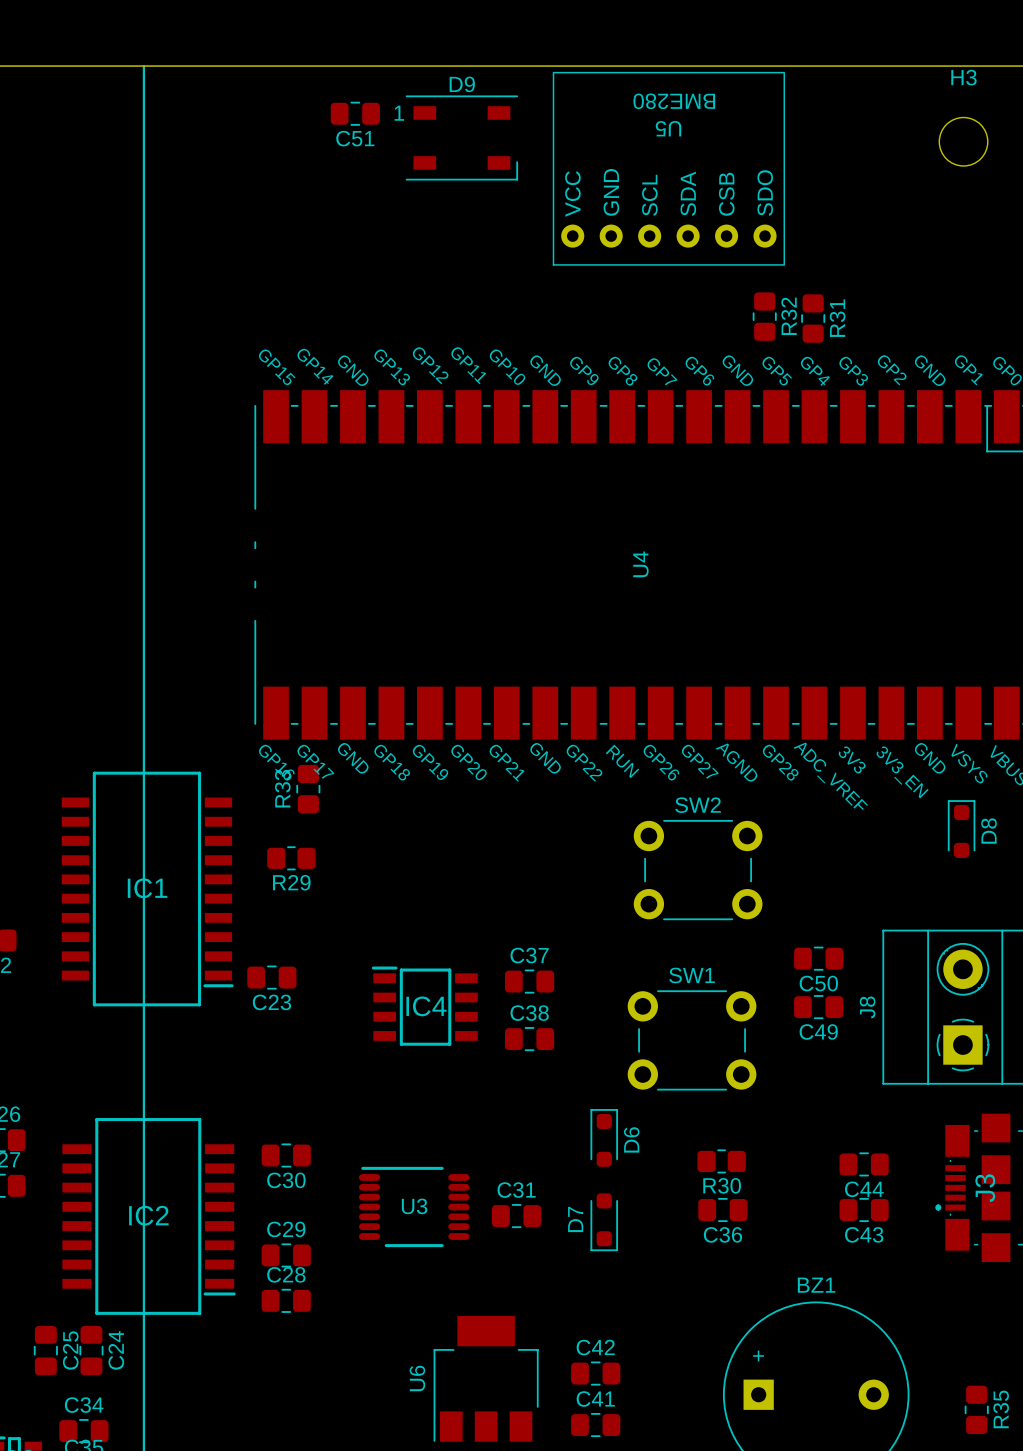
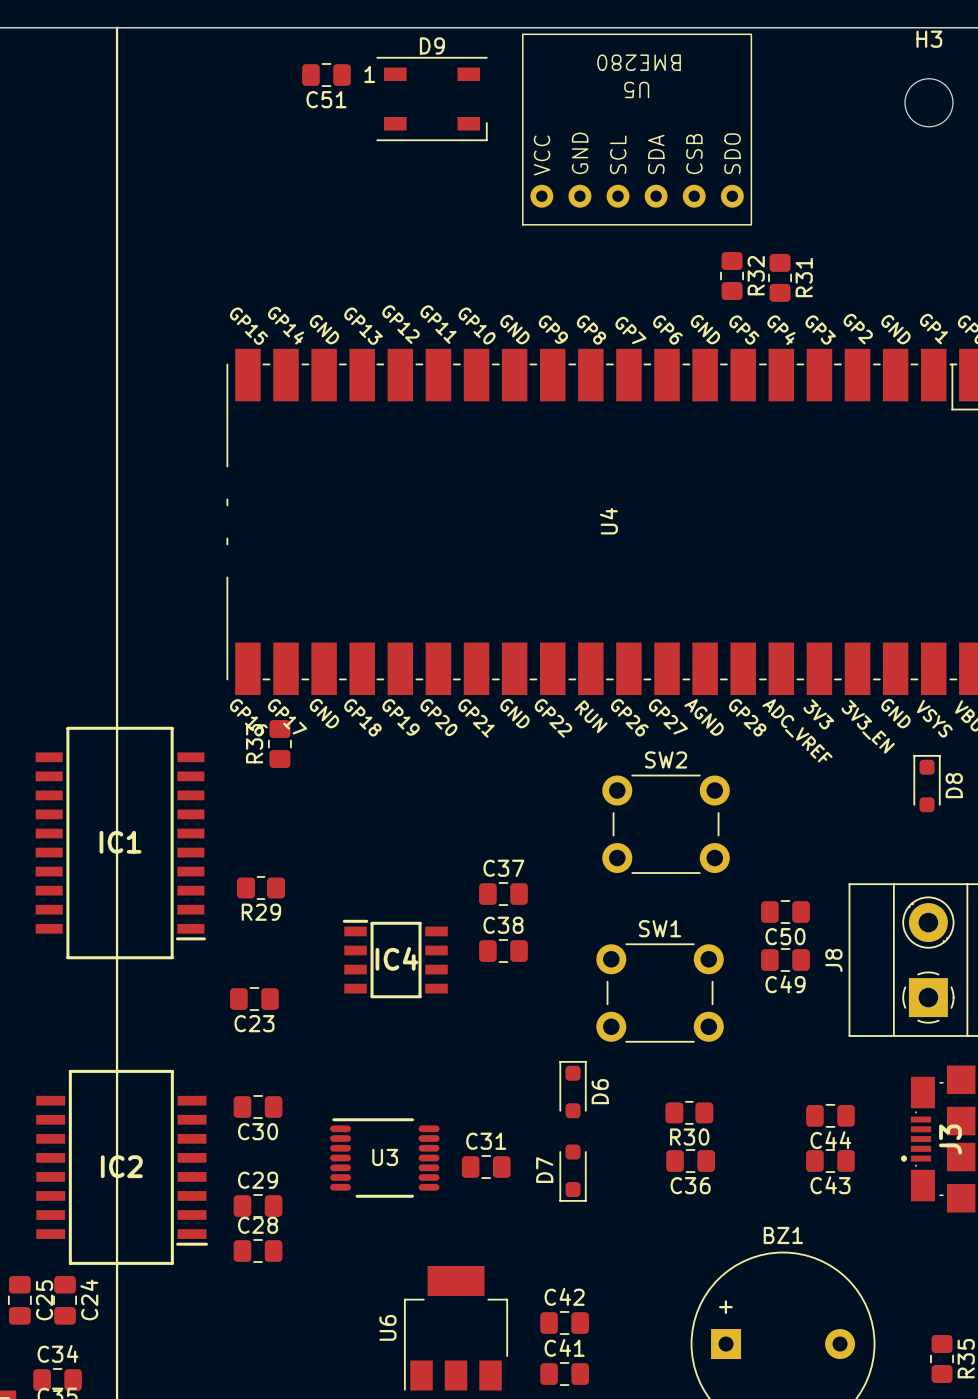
R29 position: (291, 858) -> (261, 888)
C23 position: (271, 977) -> (254, 999)
C37 position: (529, 981) -> (503, 894)
C38 position: (529, 1039) -> (503, 951)

